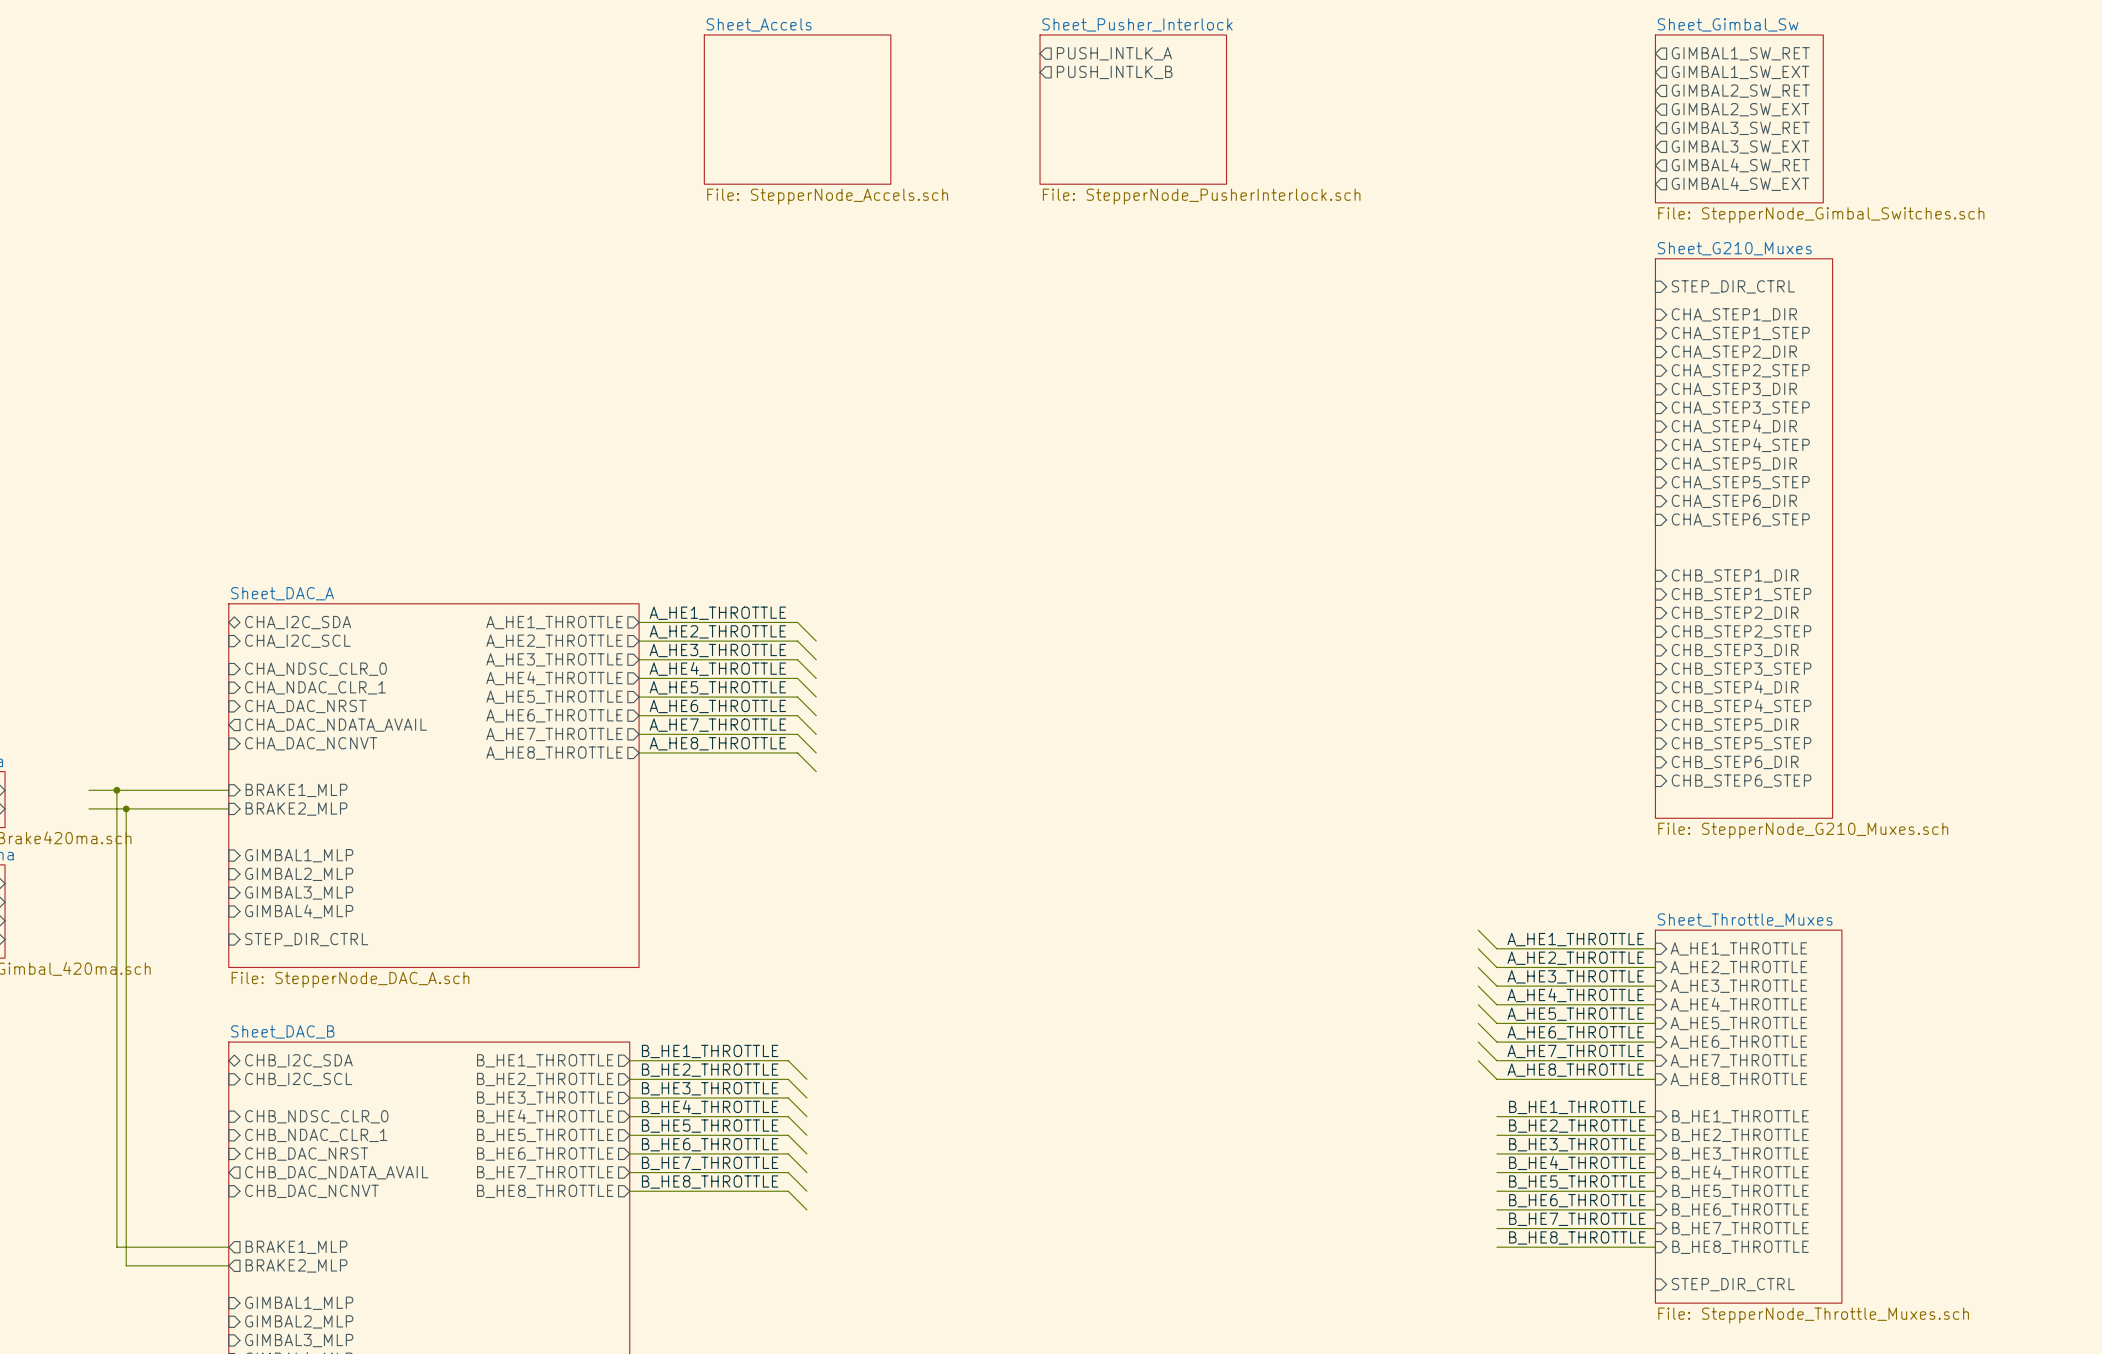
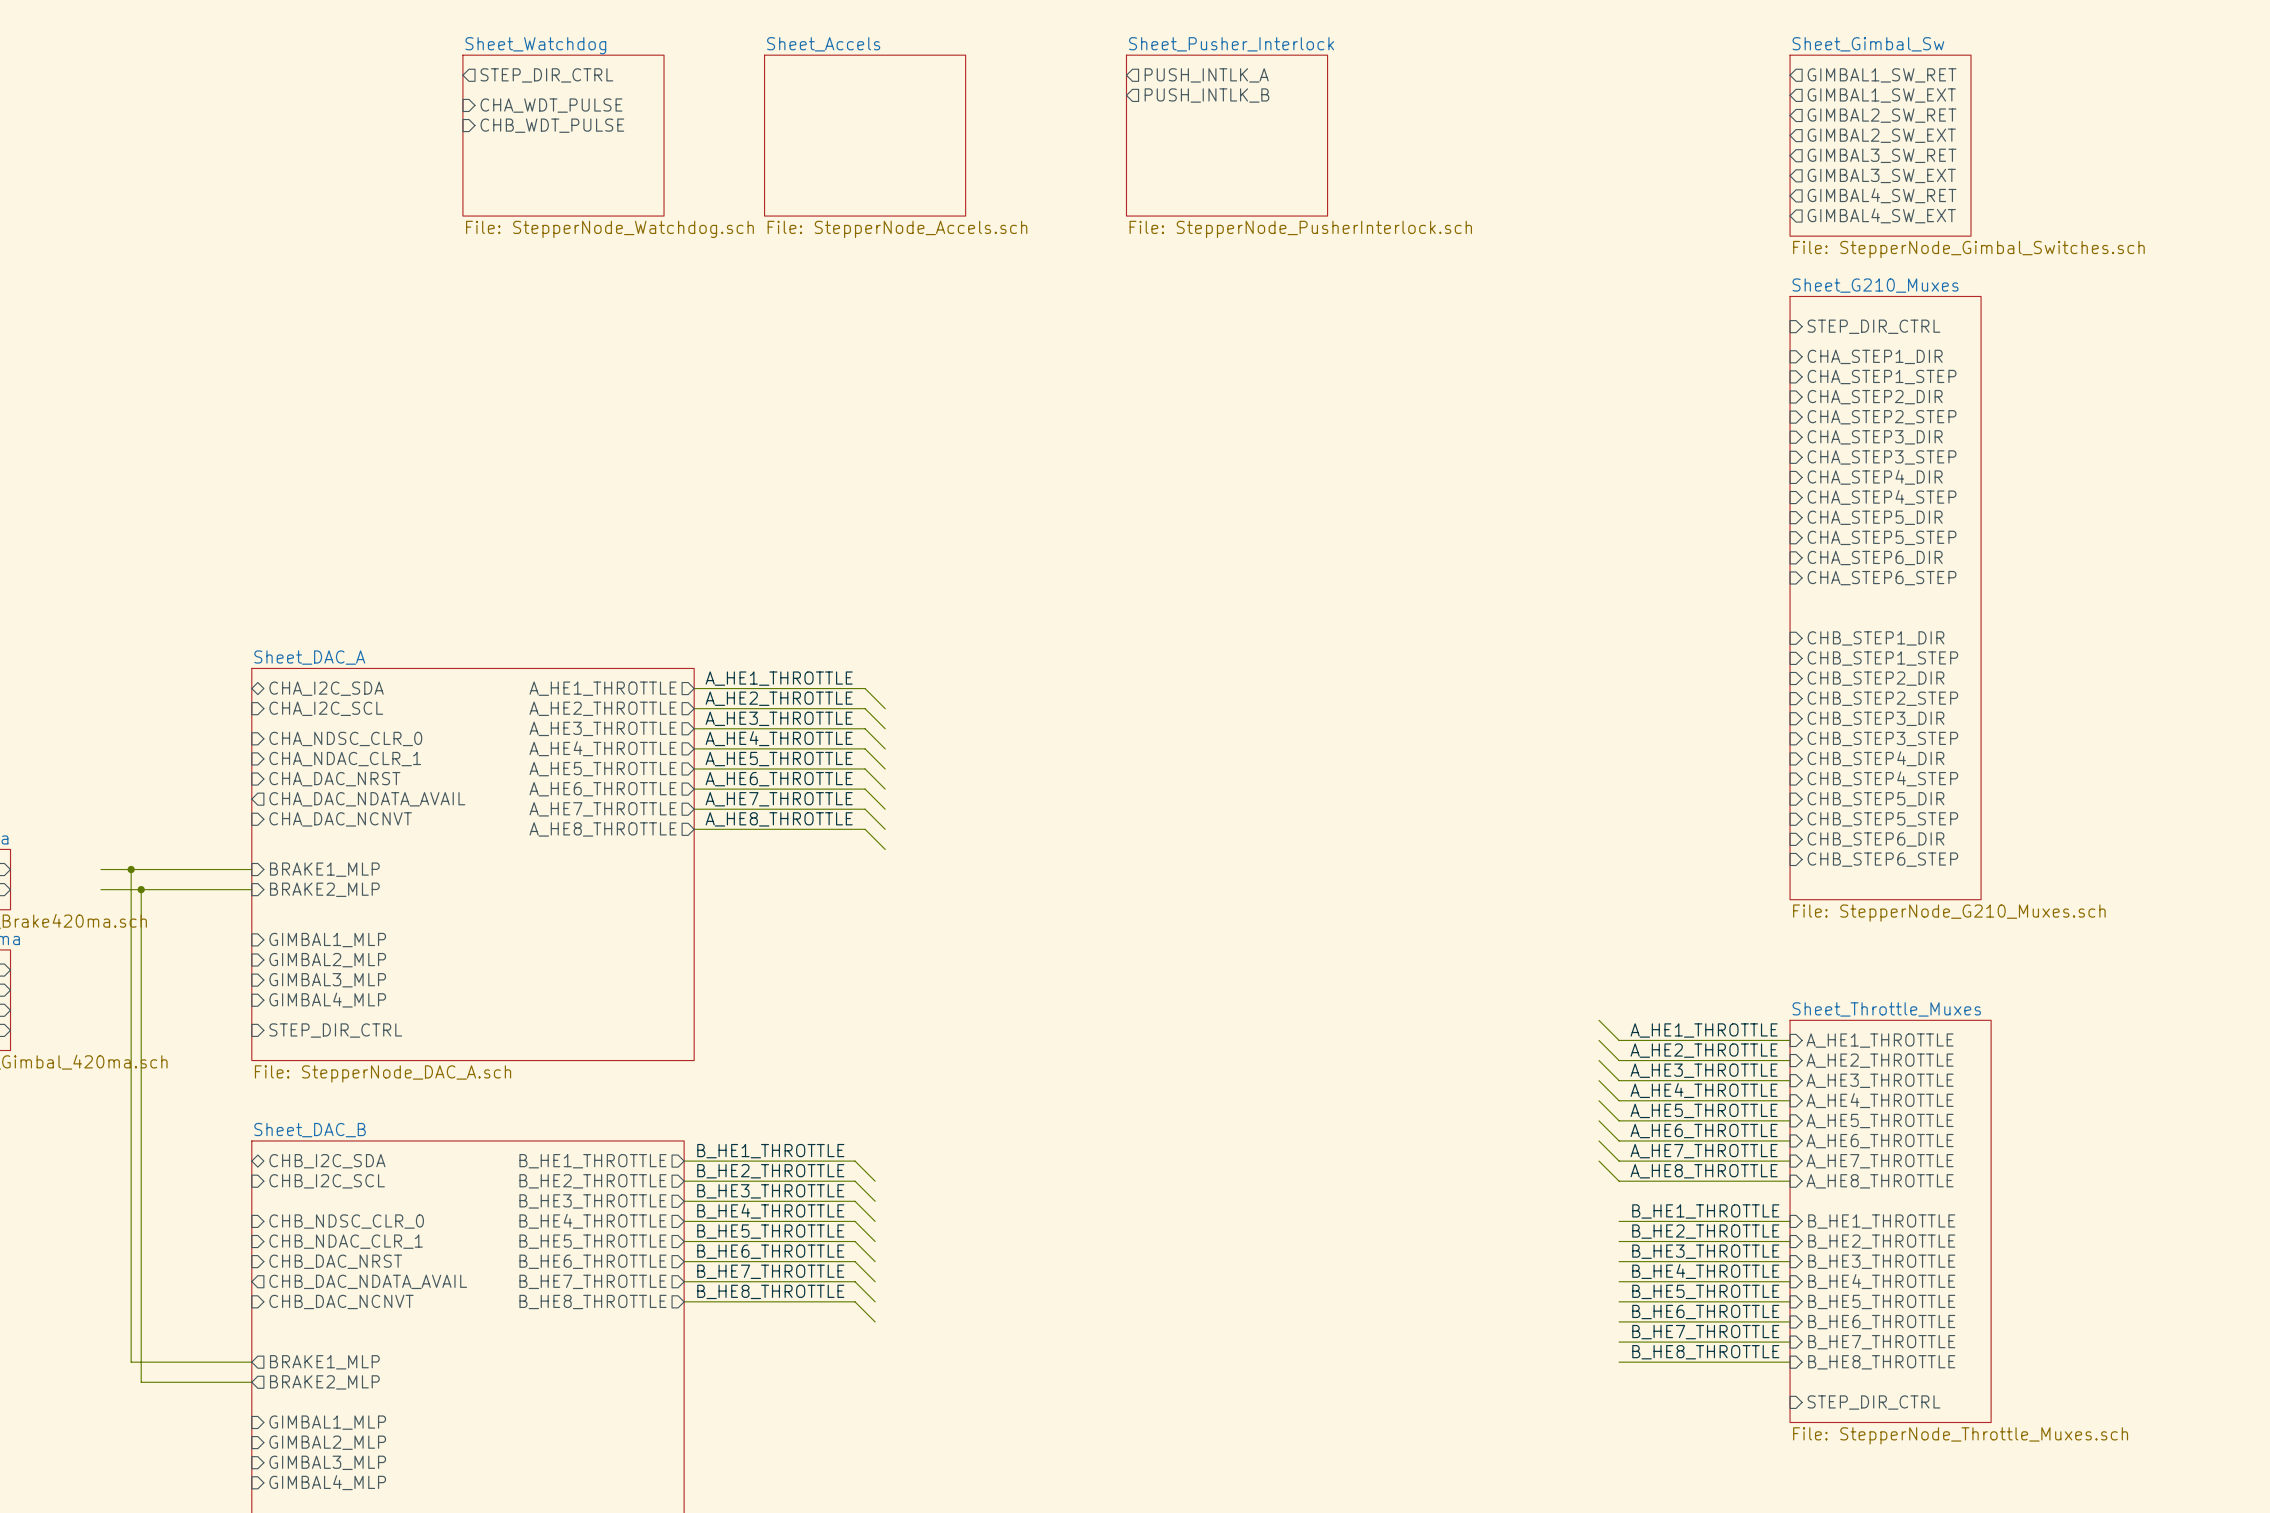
sheet pin: none -> STEP_DIR_CTRL (546, 75)
sheet pin: none -> CHA_WDT_PULSE (551, 105)
sheet pin: none -> CHB_WDT_PULSE (552, 125)
sheet Sheet_Watchdog: none -> File: StepperNode_Watchdog.sch (563, 135)

